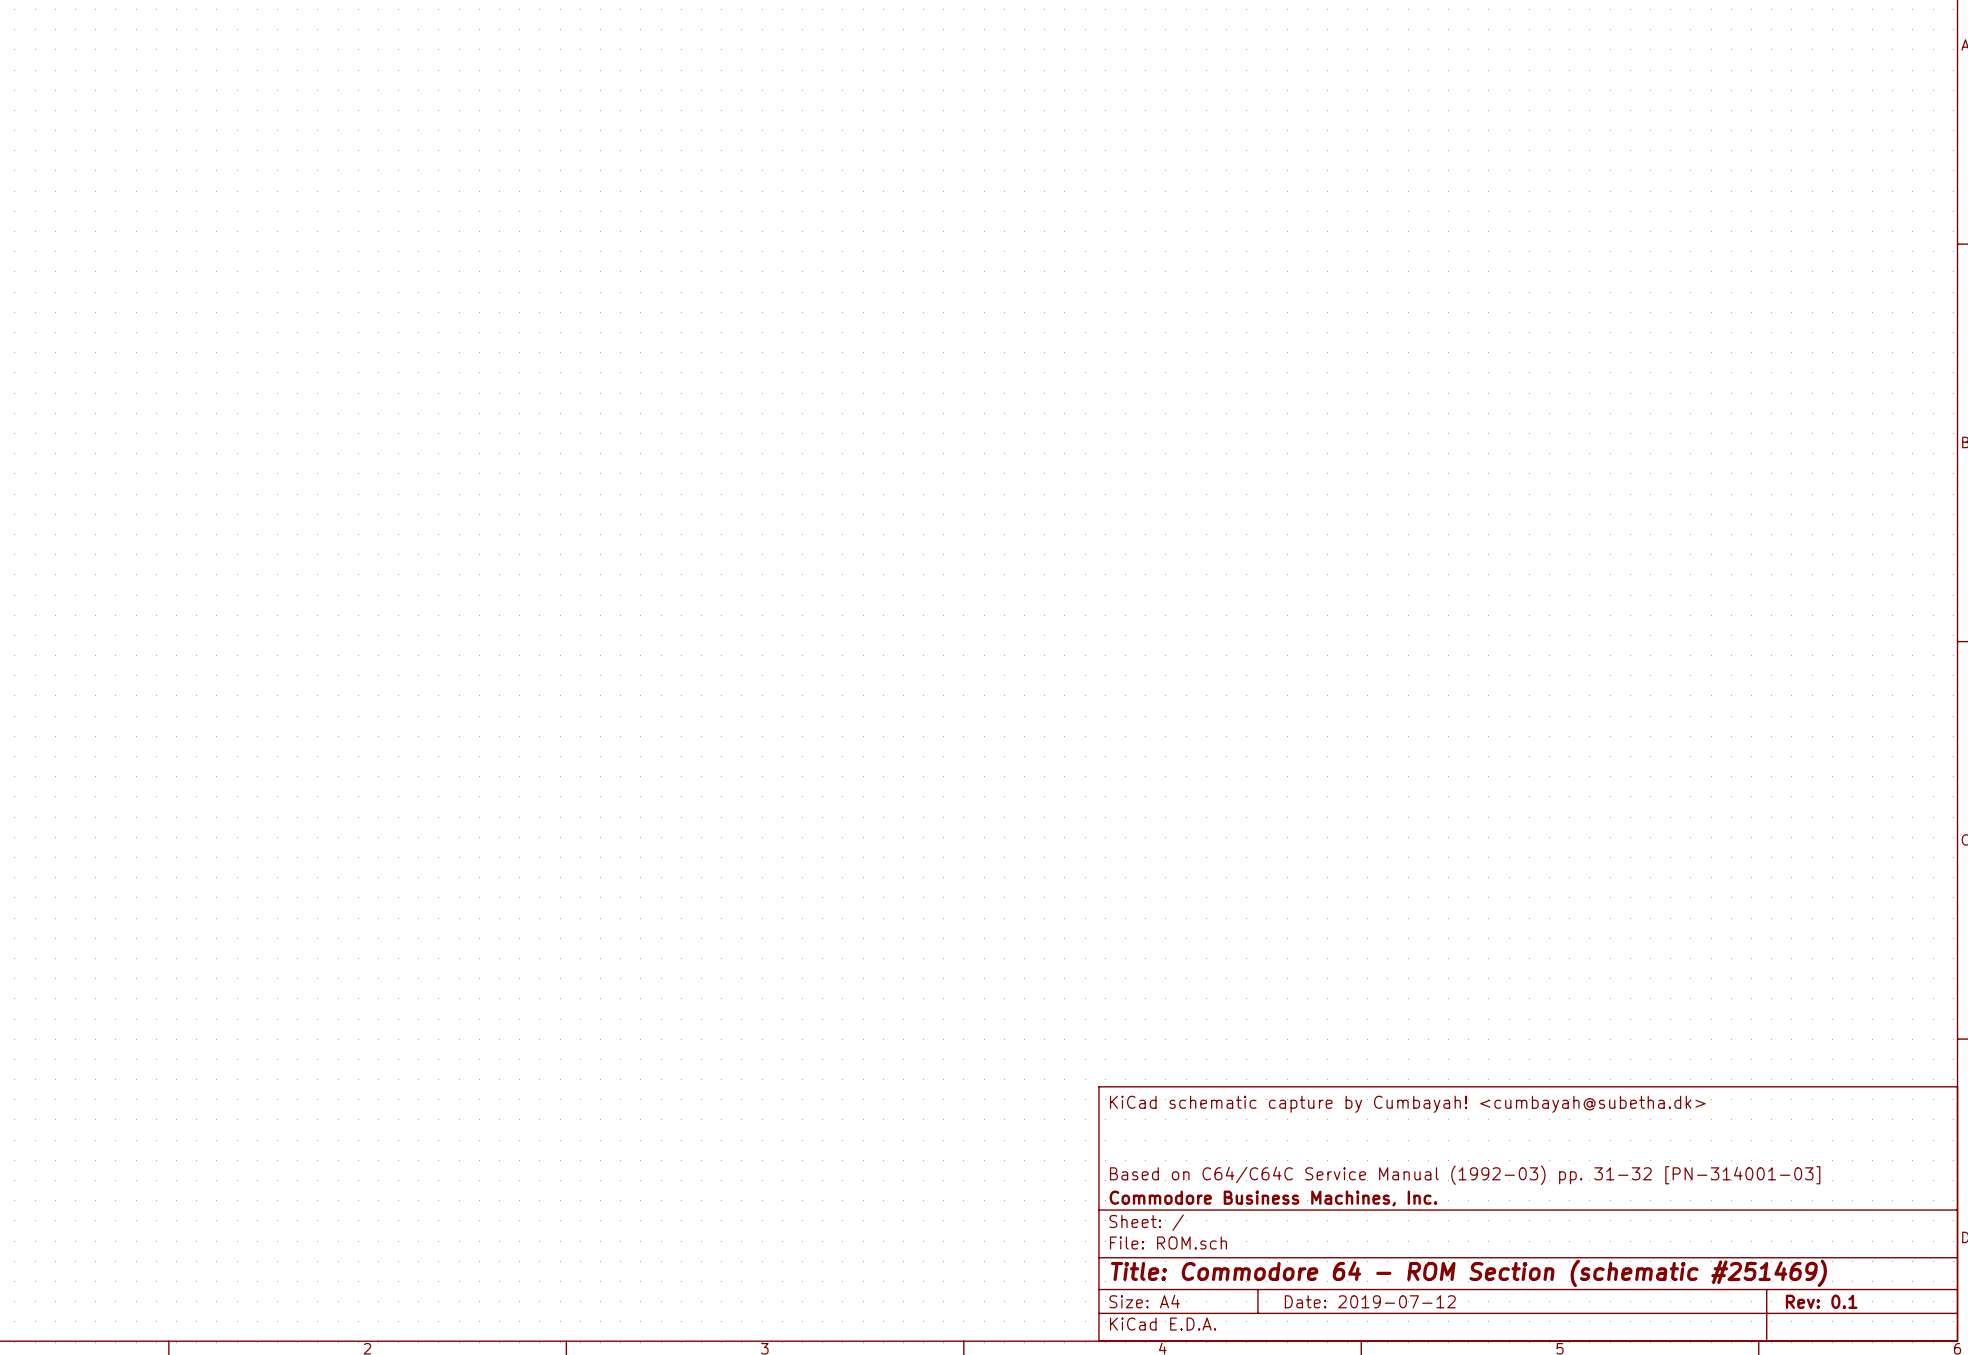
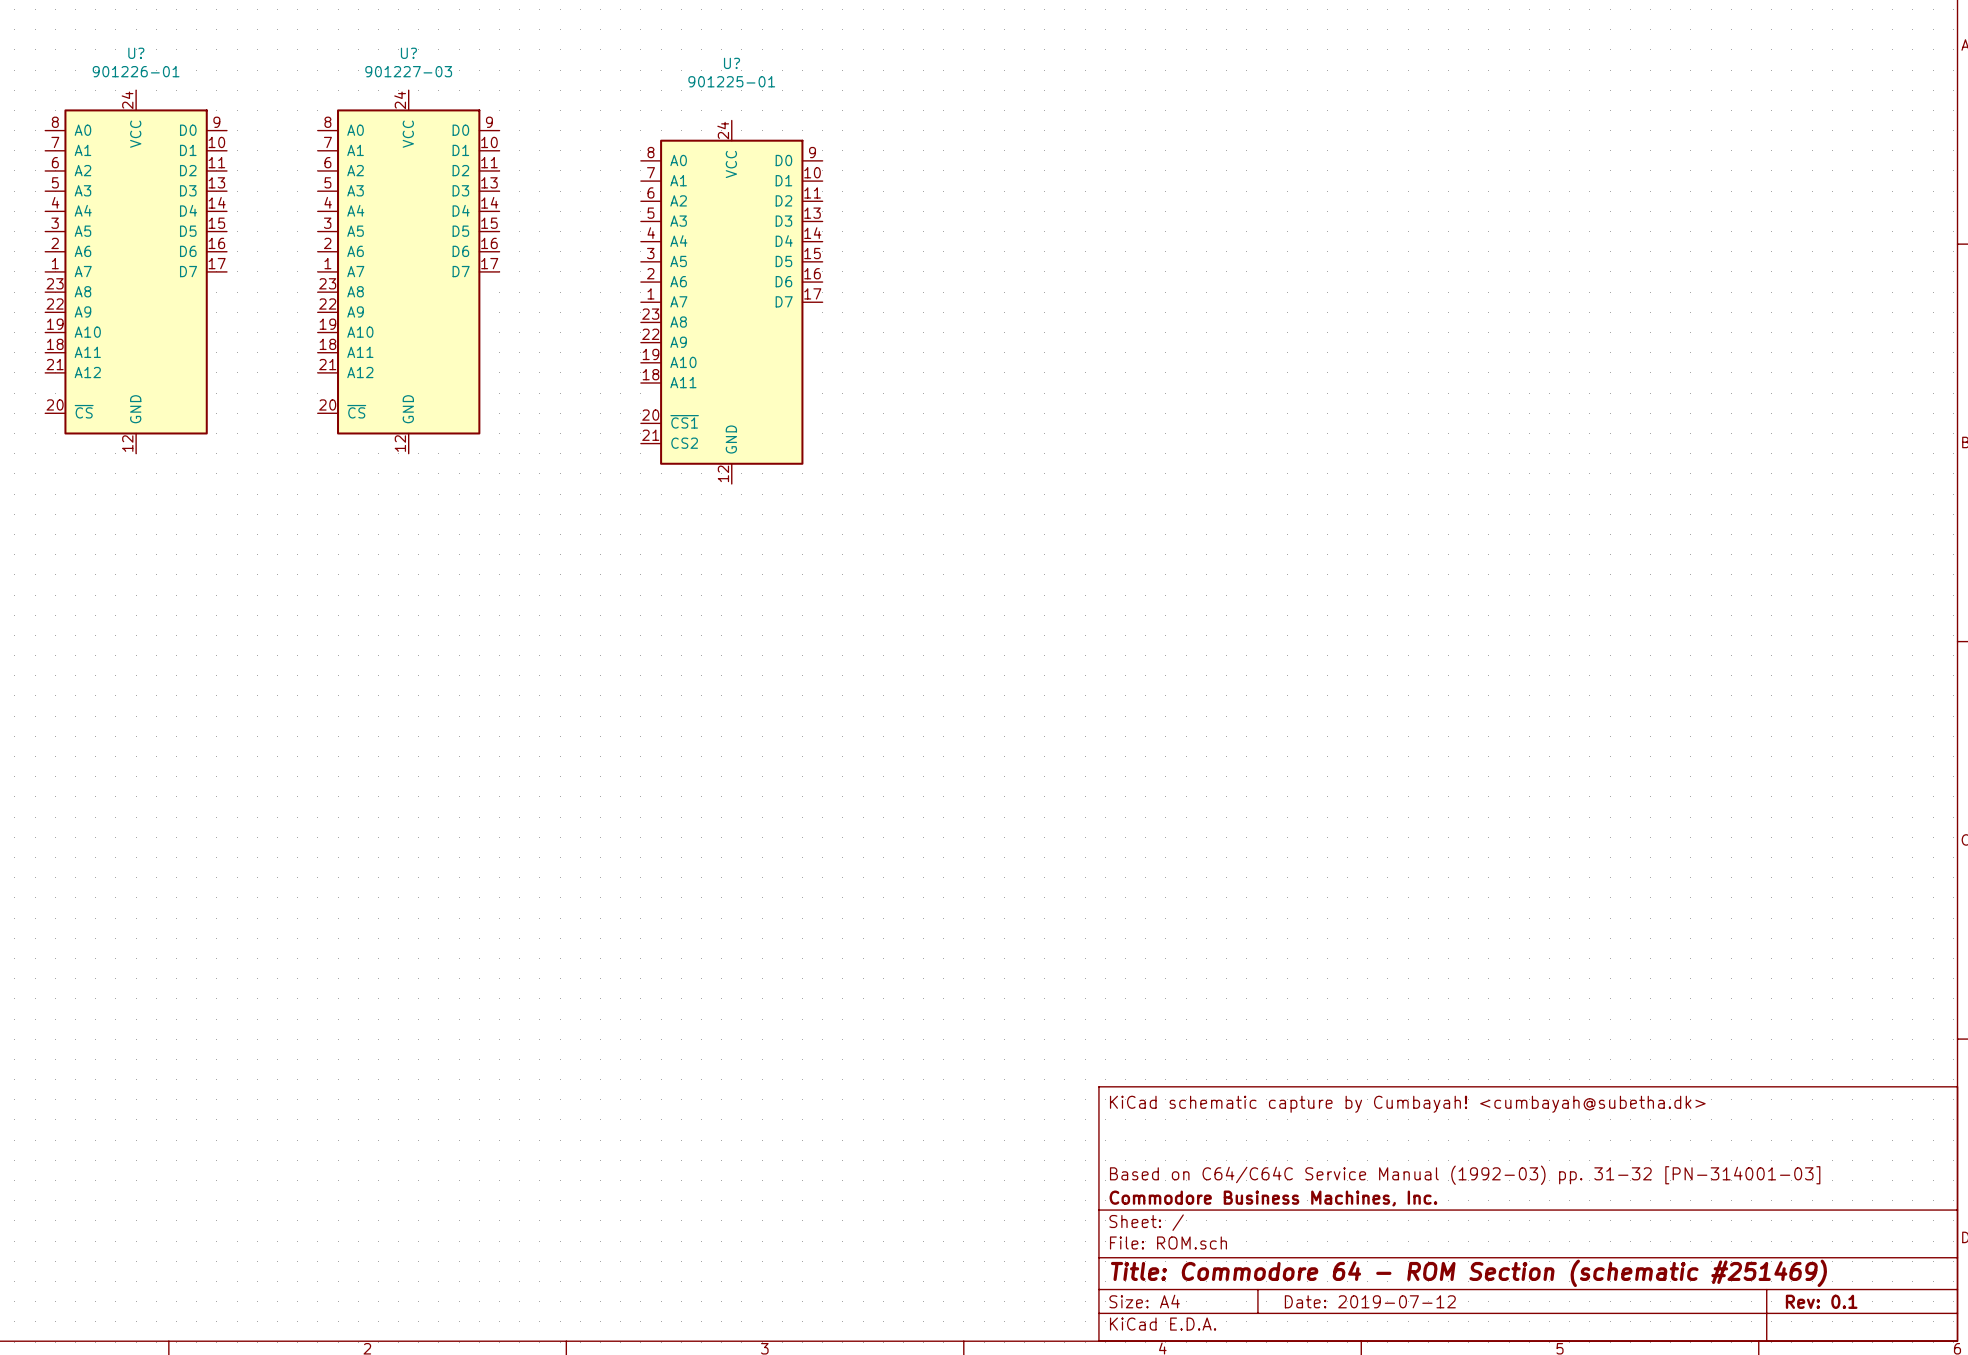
U?: none -> 901226-01 (136, 271)
U?: none -> 901227-03 (408, 271)
U?: none -> 901225-01 (731, 302)

